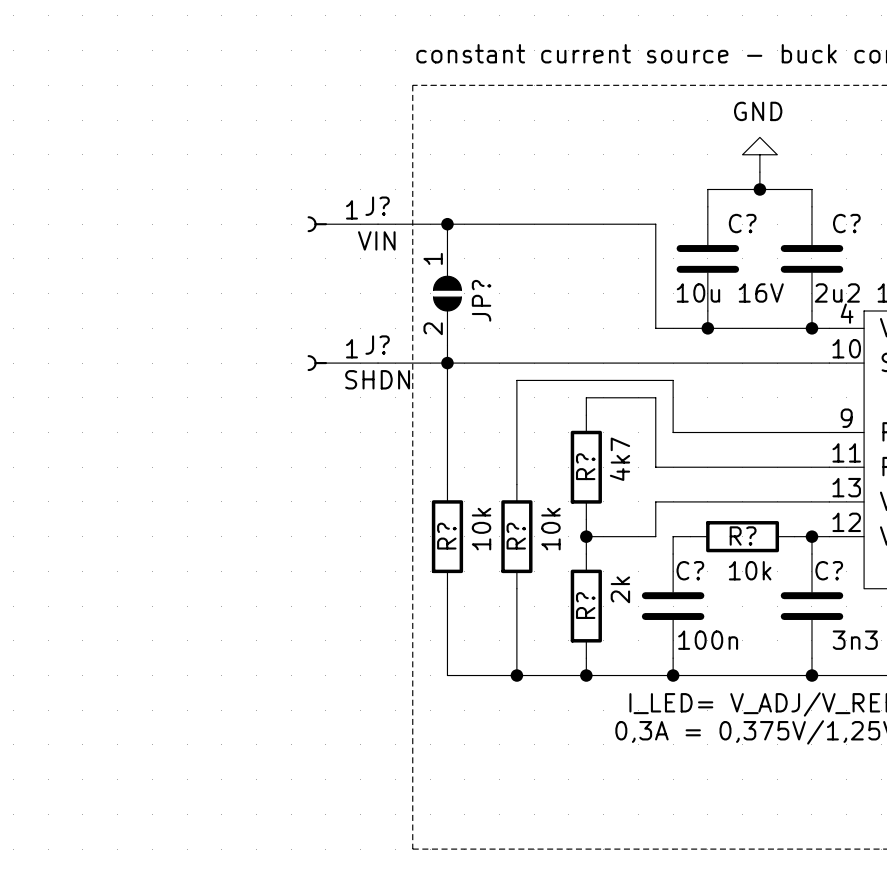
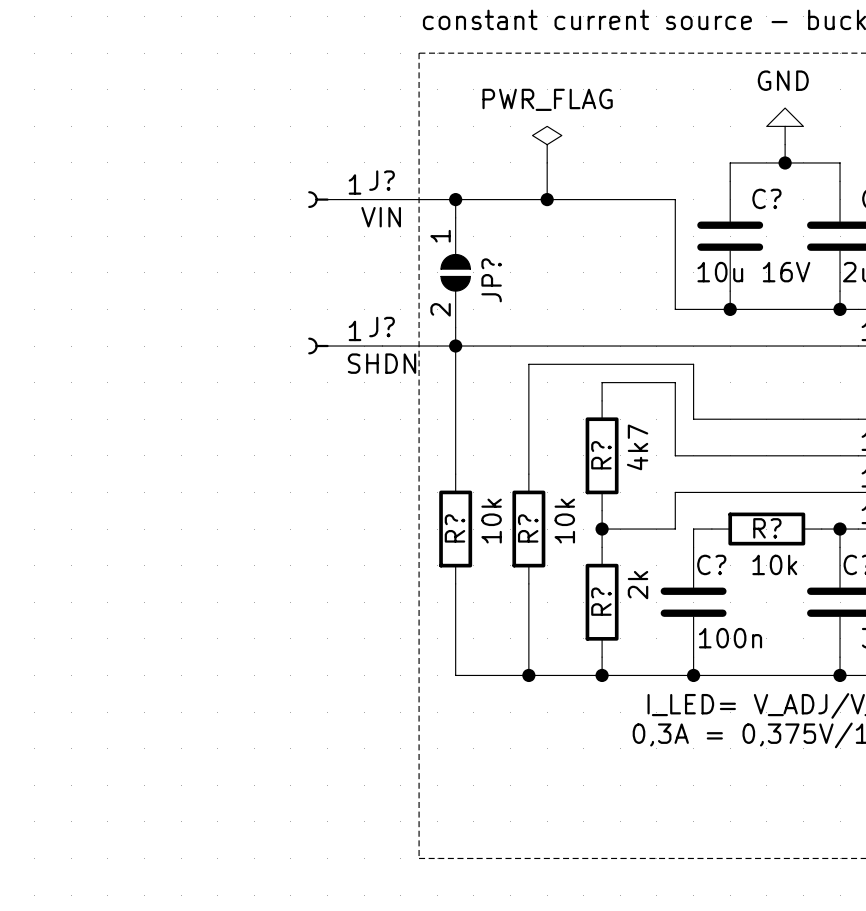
power symbol: none -> PWR_FLAG (547, 144)
wire: none -> (547, 162) (547, 199)
junction: none -> (547, 199)

